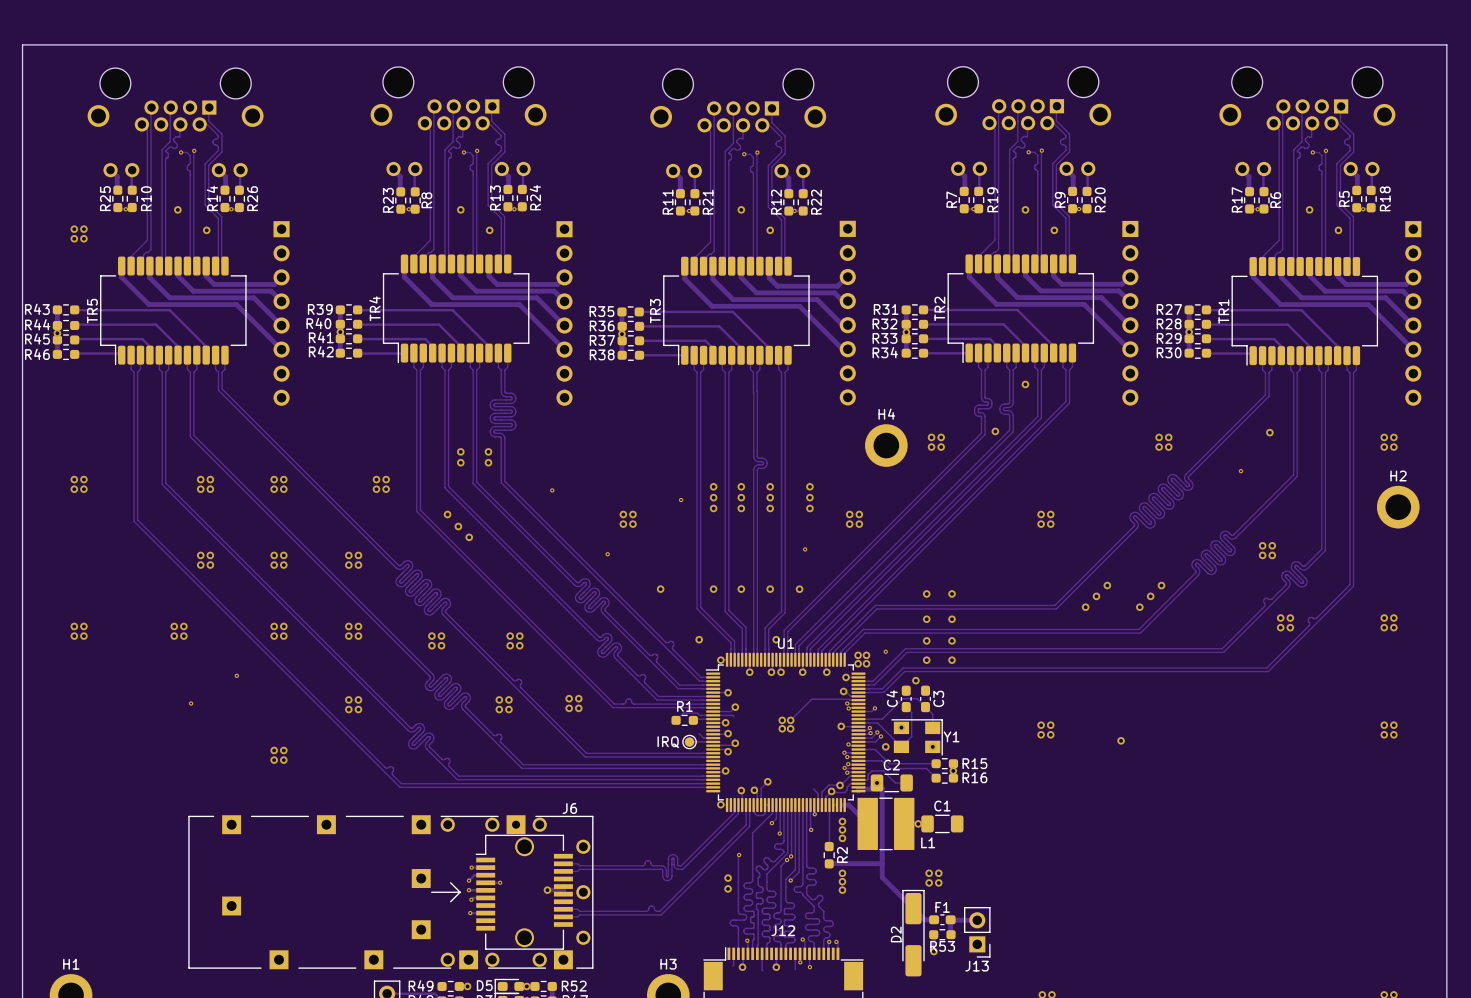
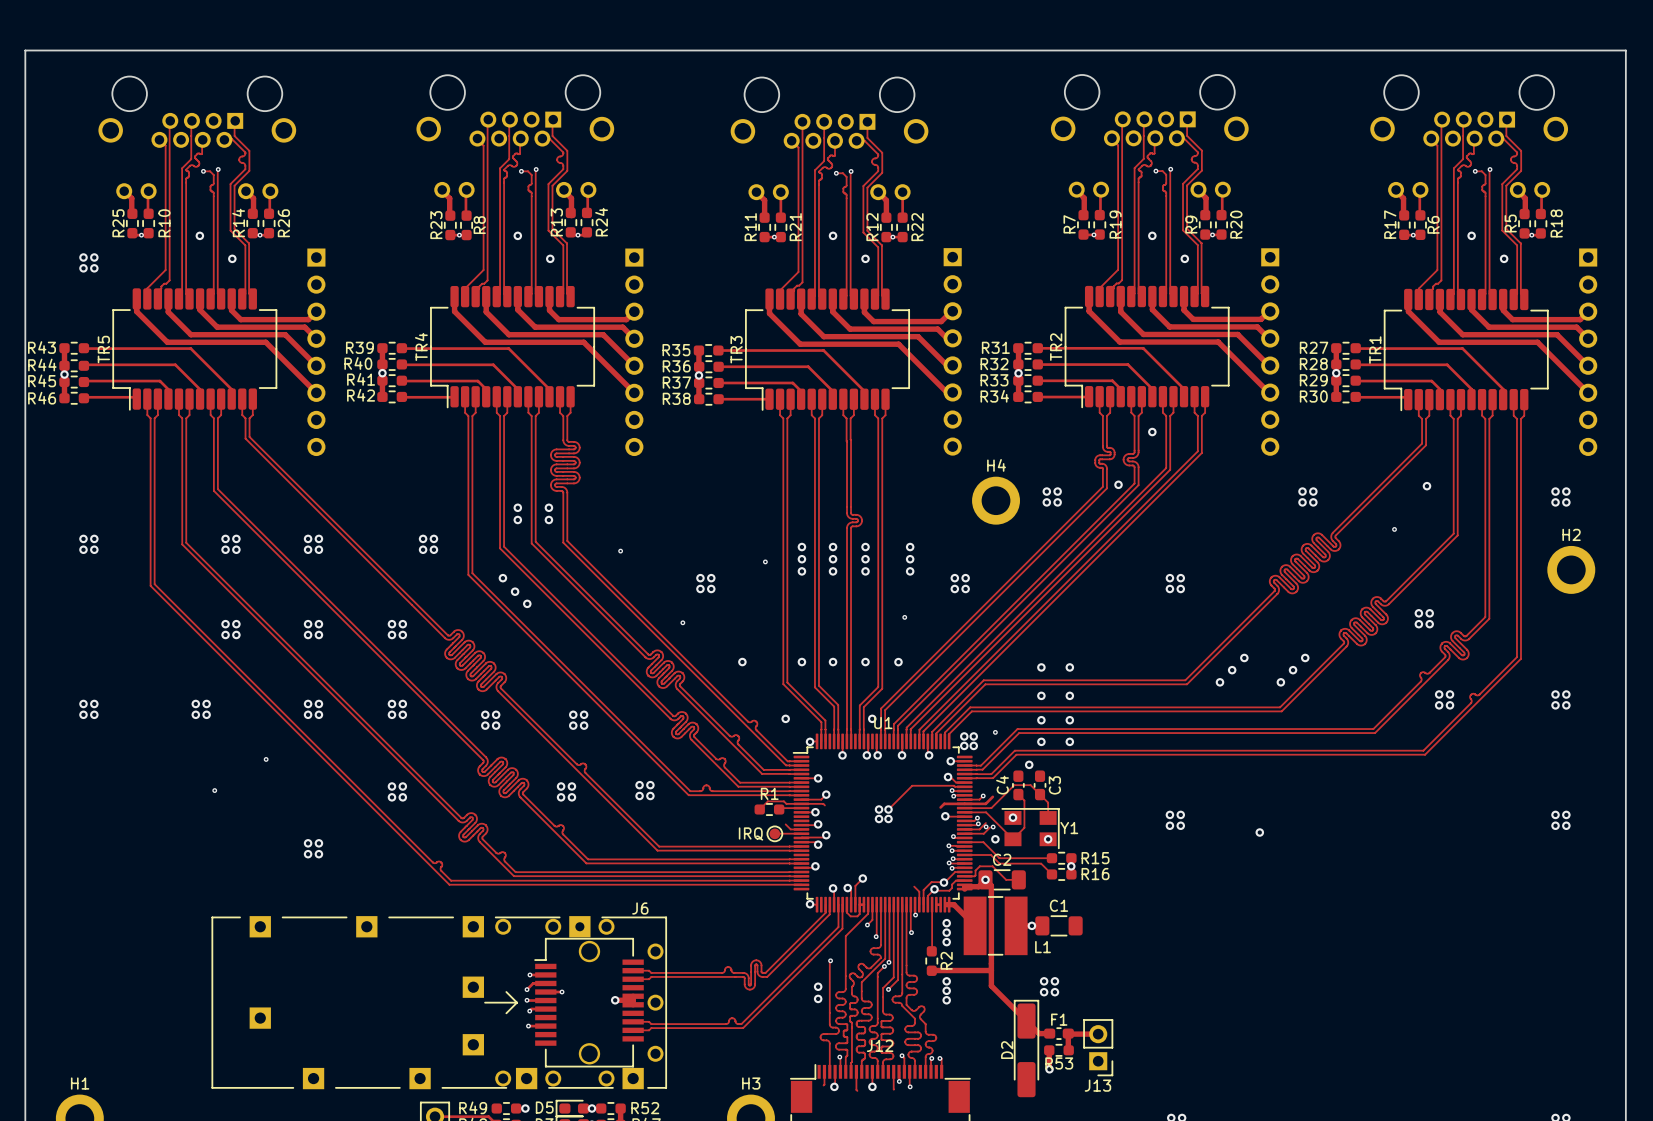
track: none -> (992, 796) (985, 803) (944, 803) (940, 807)
via: (877, 732) -> none
via: none -> (986, 826)
via: none -> (993, 827)
via: (880, 736) -> none

